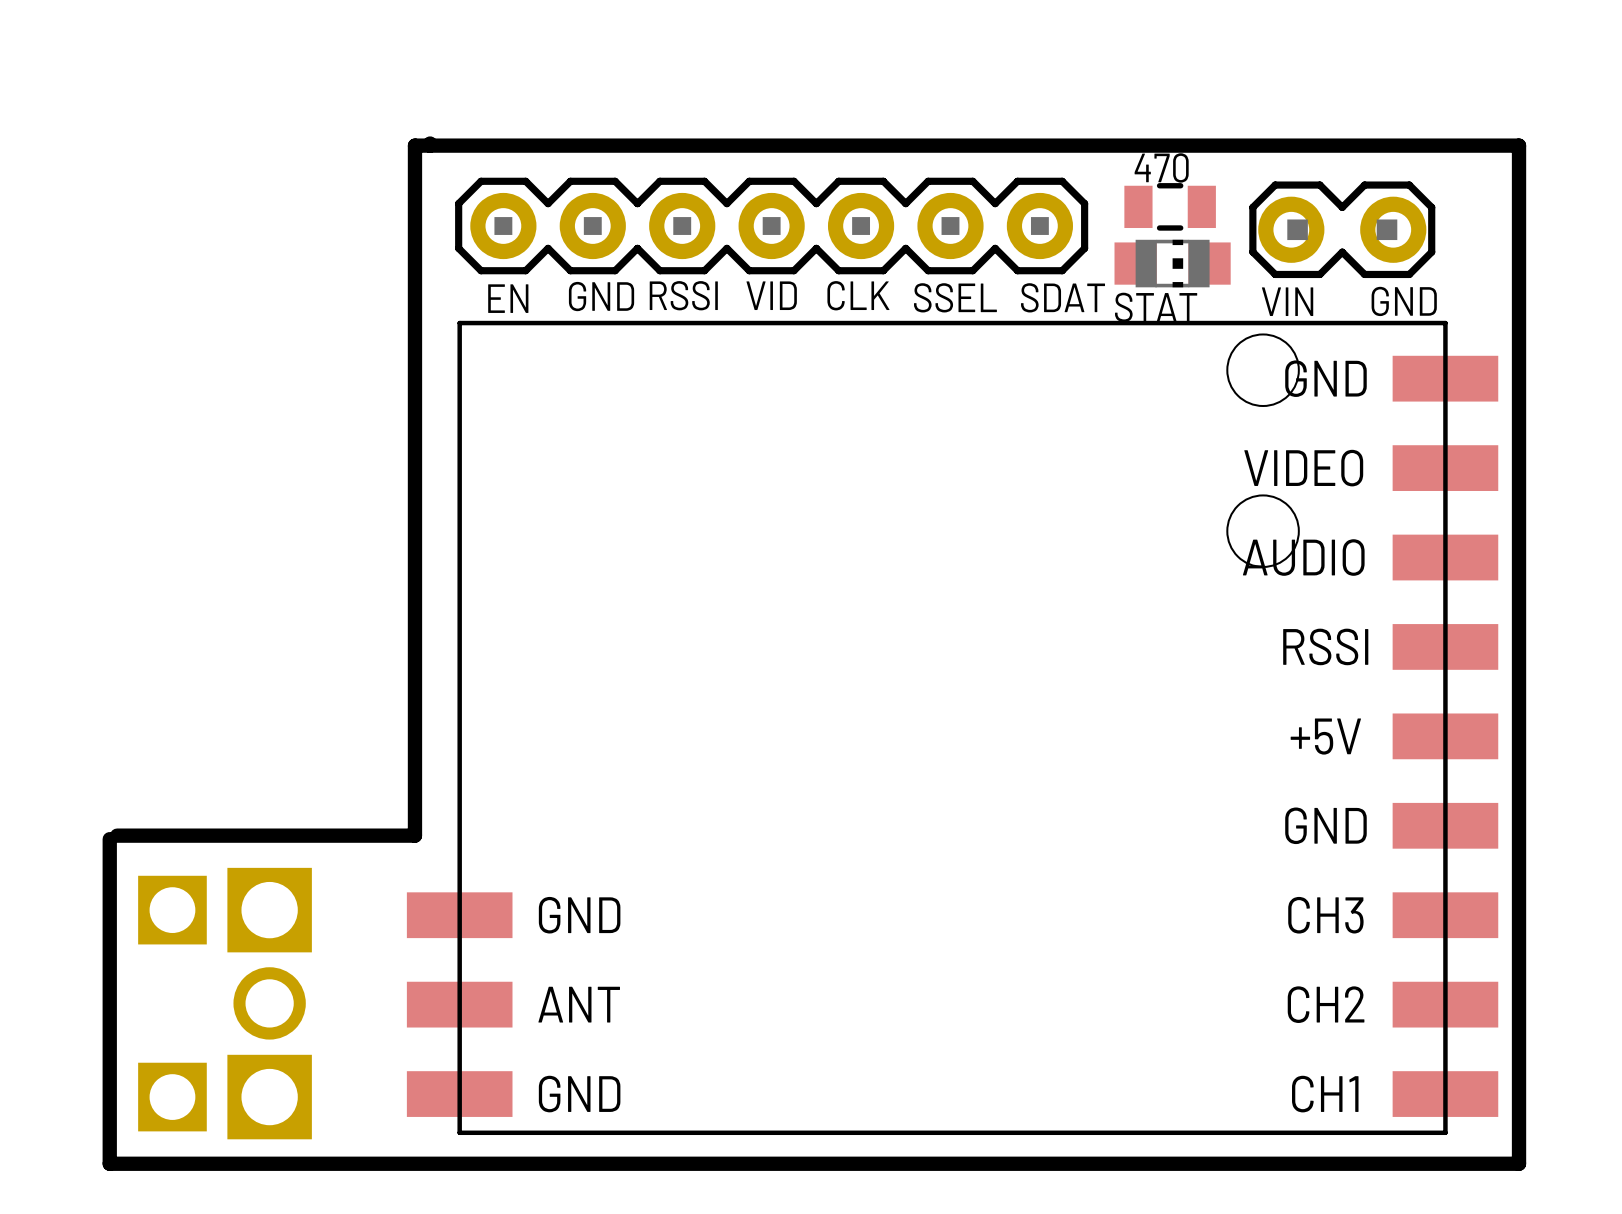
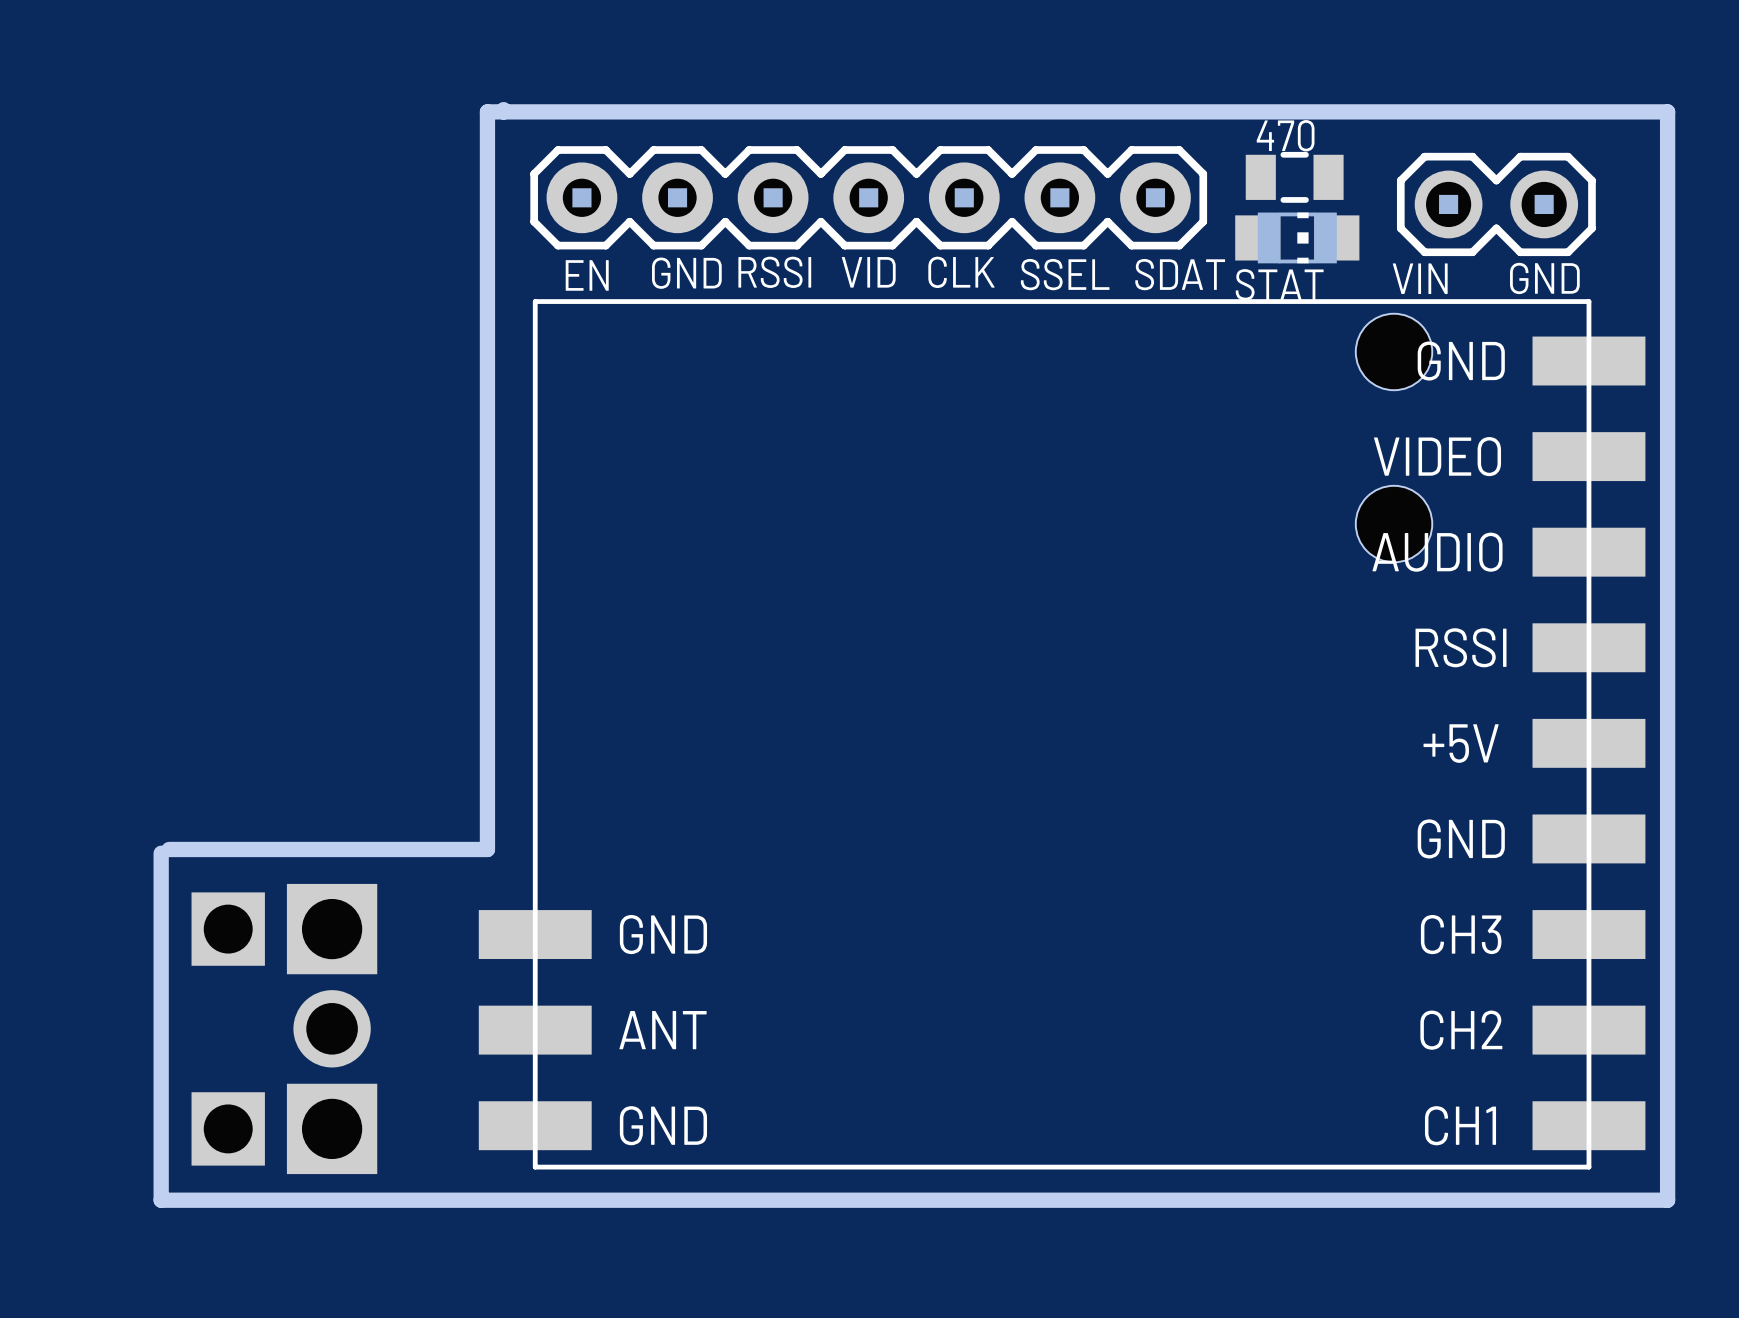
part footprint: [1249, 181, 1436, 279] -> [1396, 152, 1596, 257]

